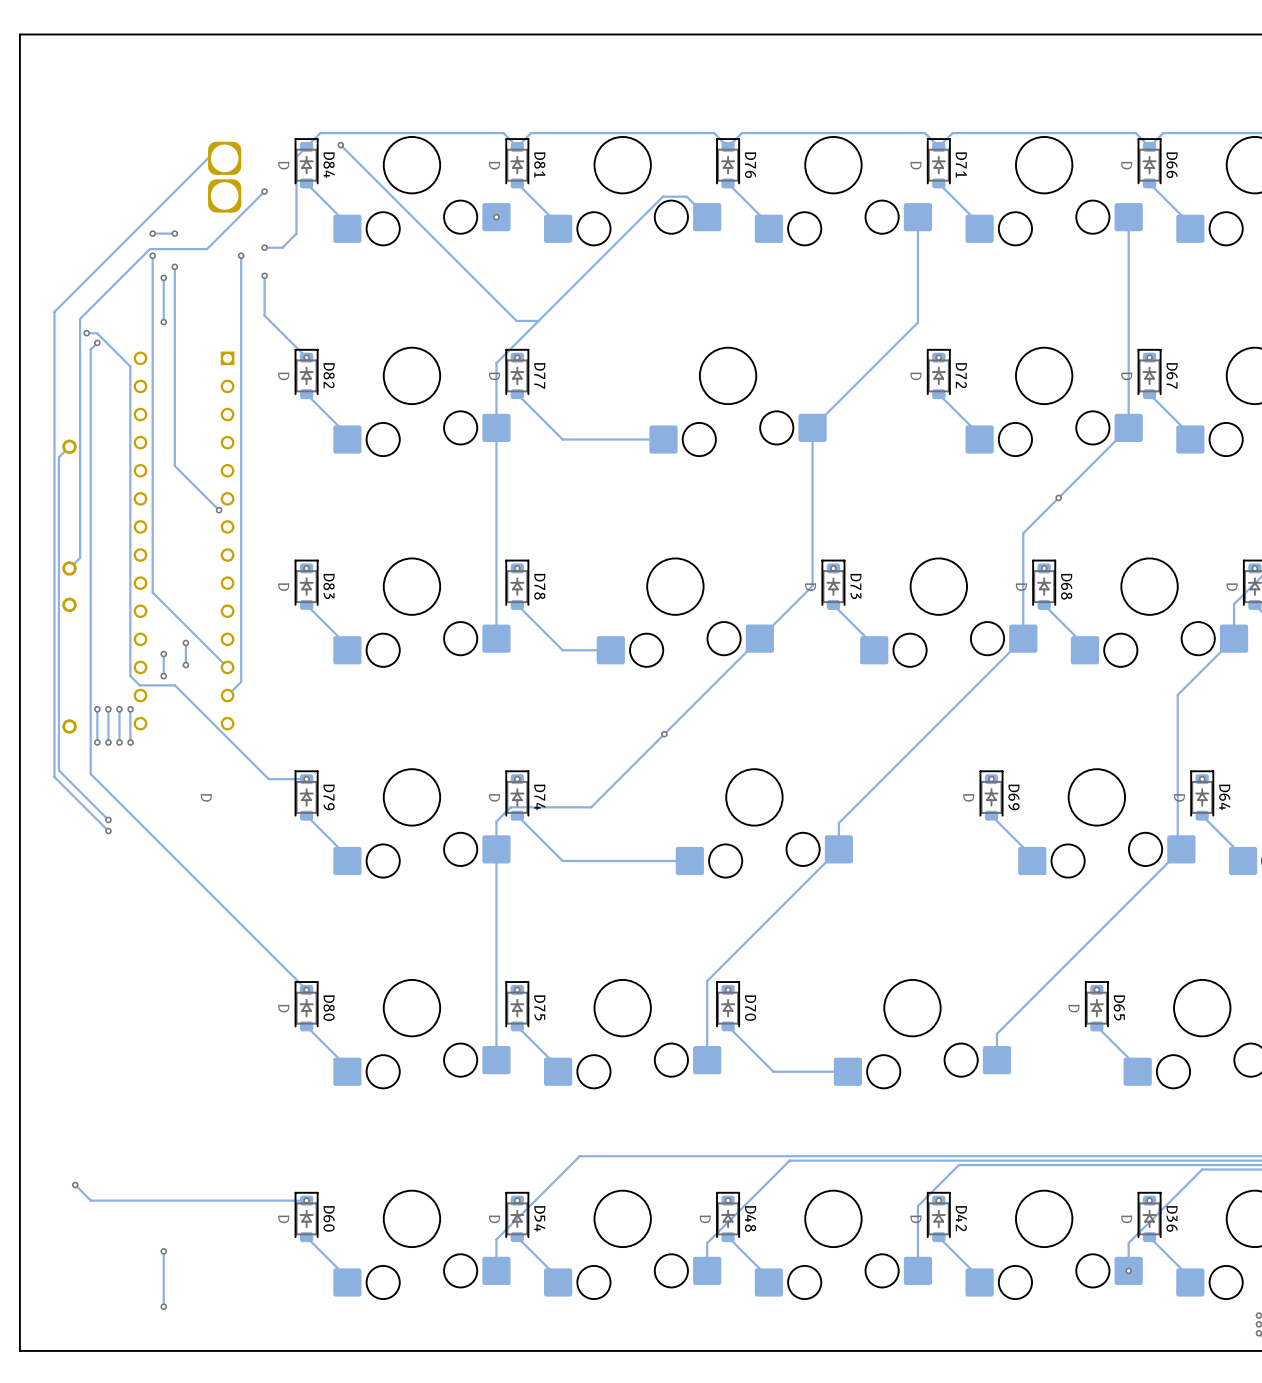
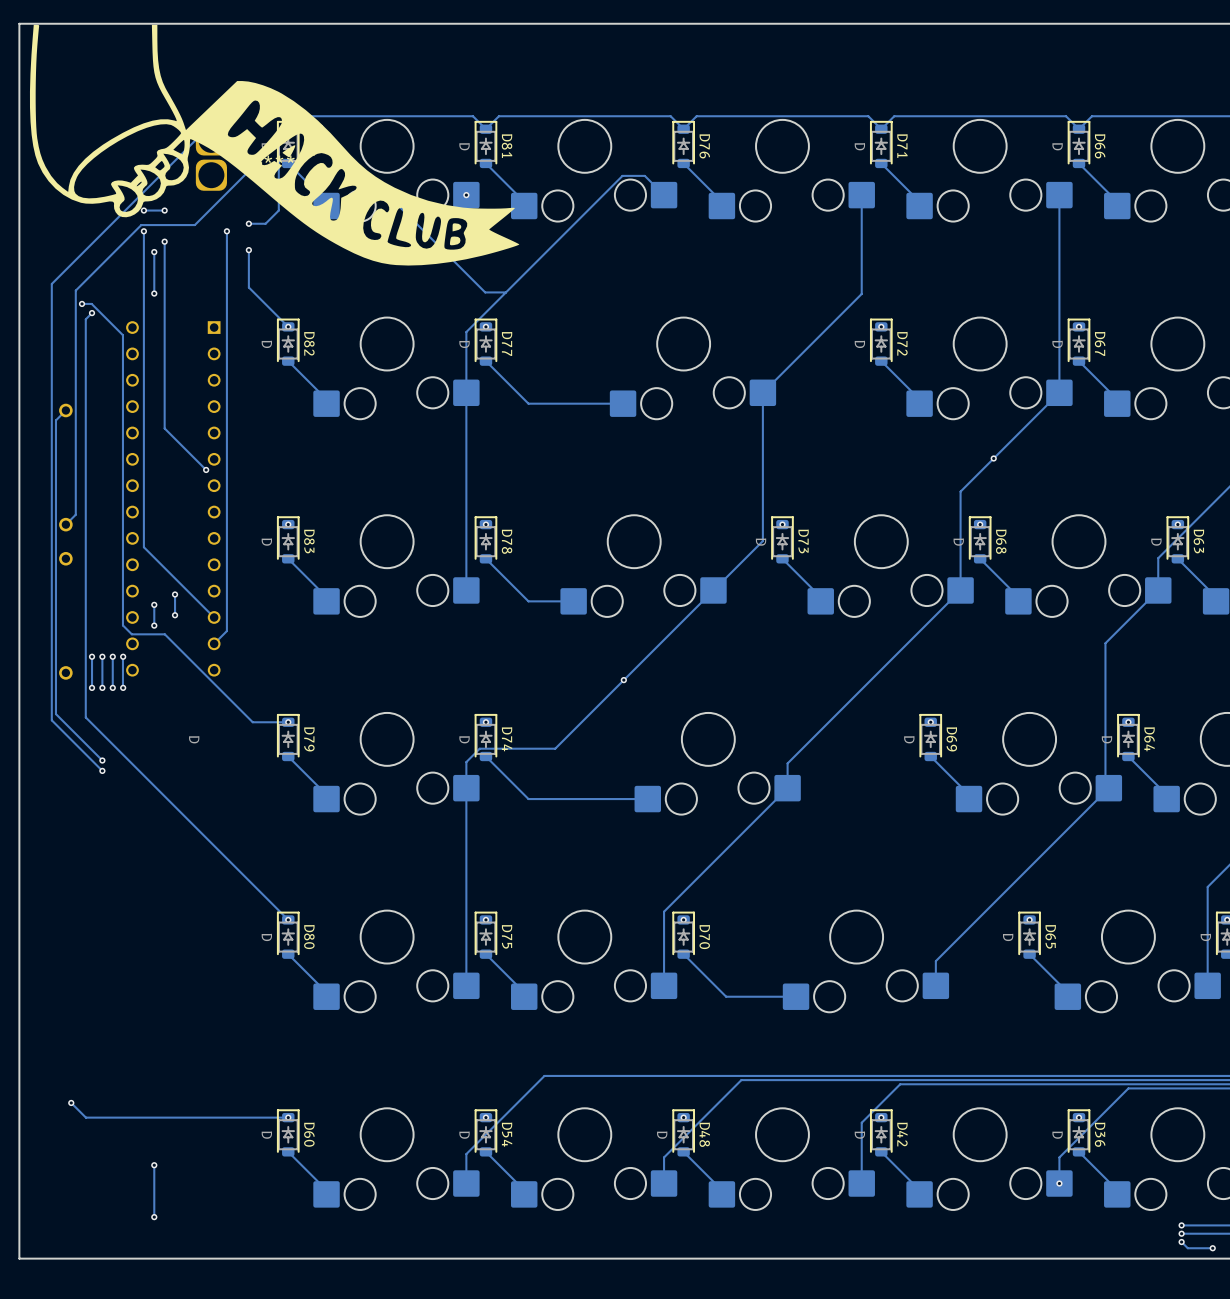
part: none -> (274, 145)

